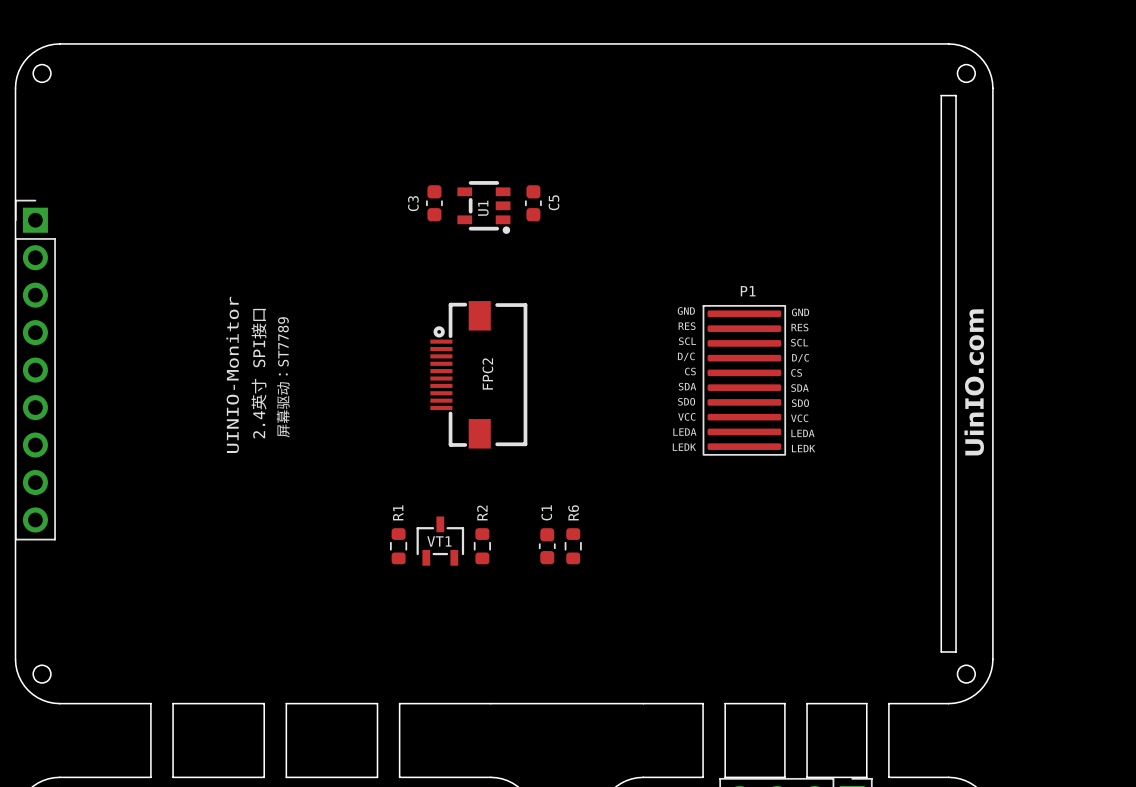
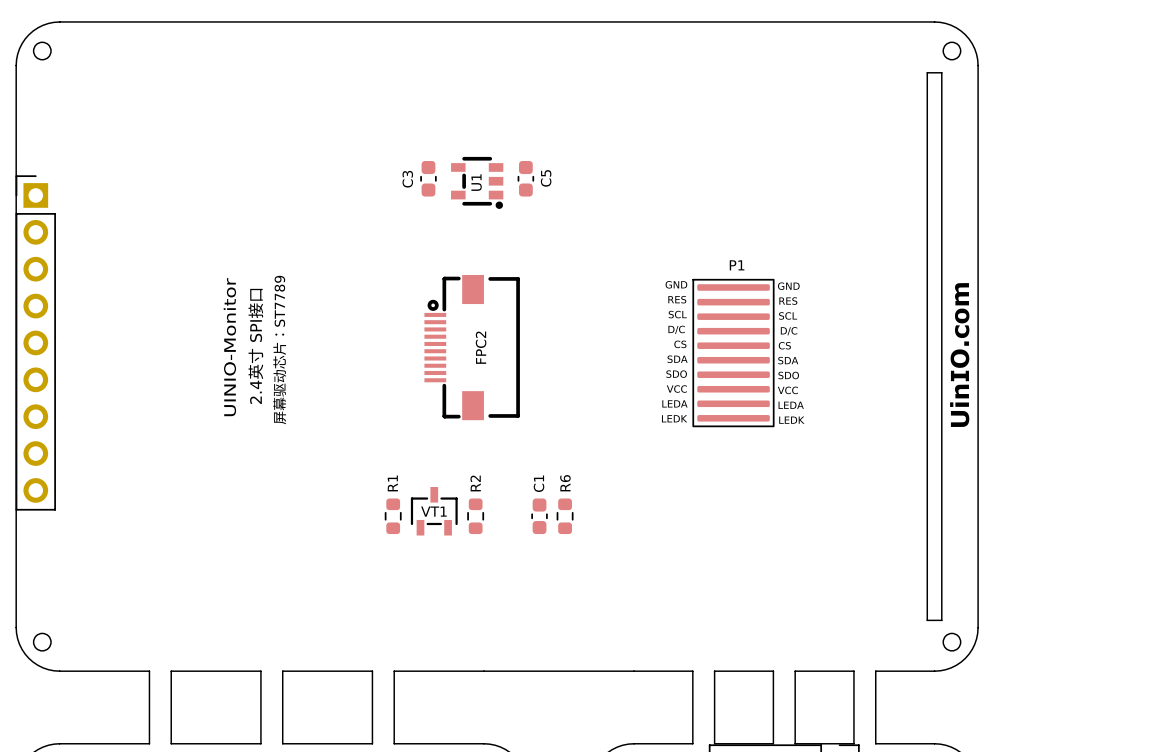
text: 屏幕驱动：ST7789 (283, 377) -> 屏幕驱动芯片：ST7789 (279, 350)

